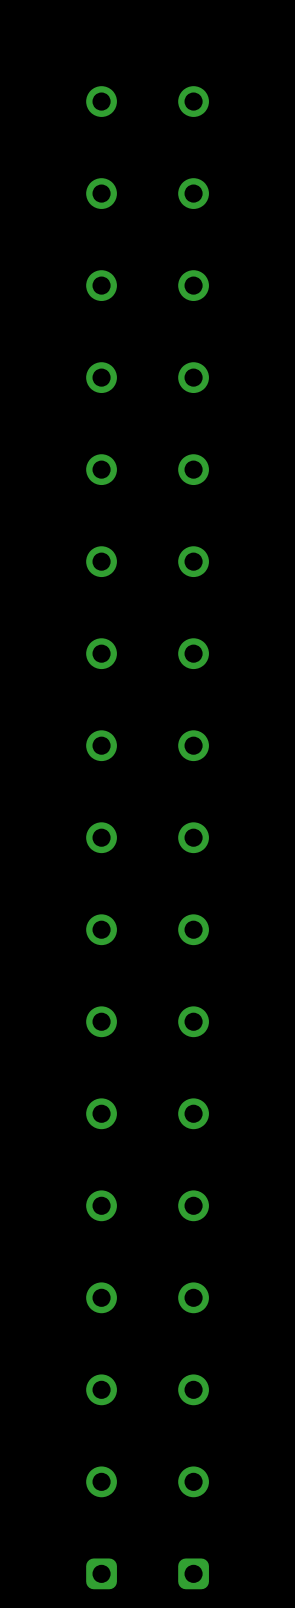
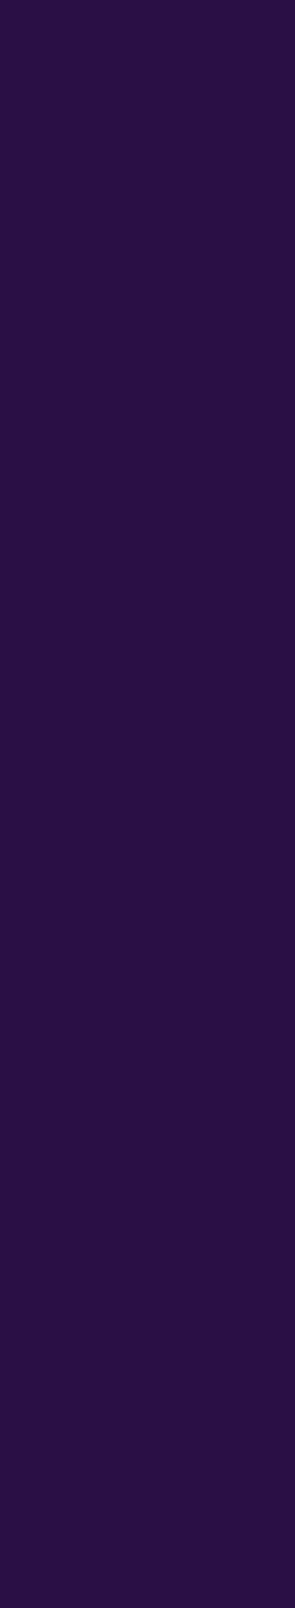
part: (147, 837) -> none

